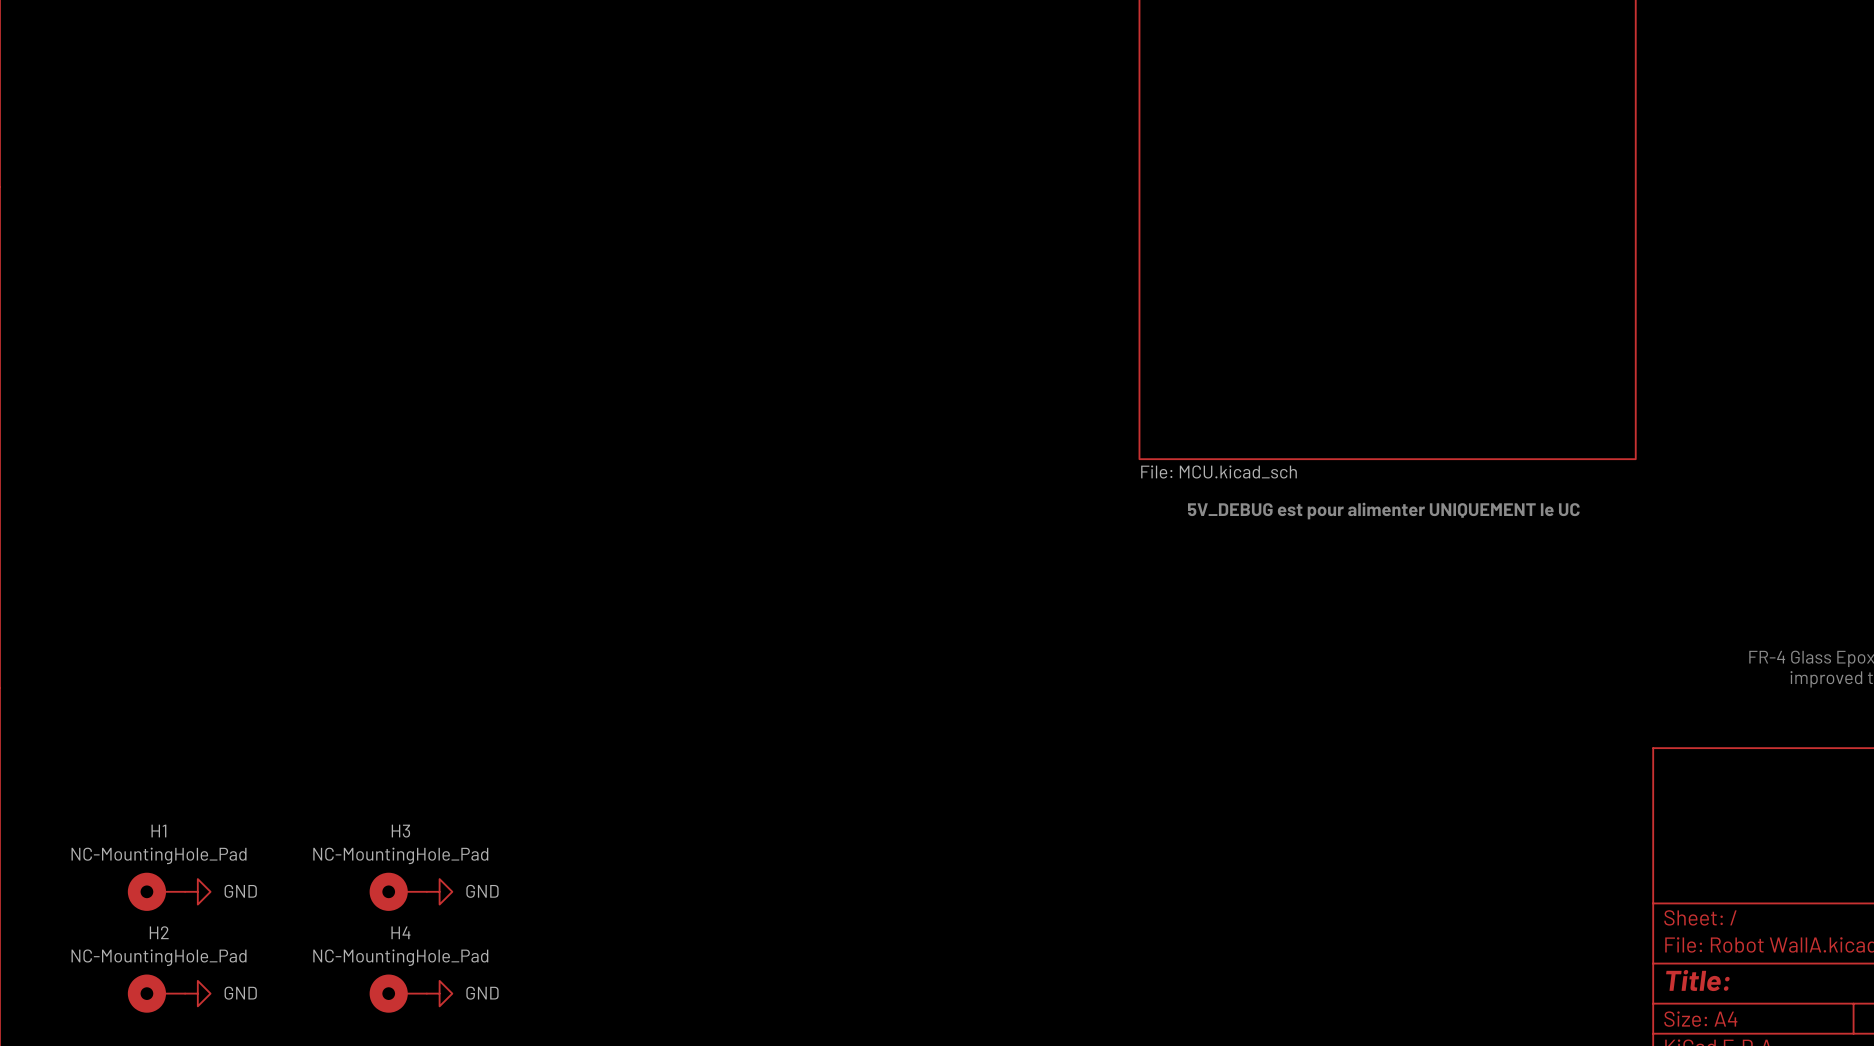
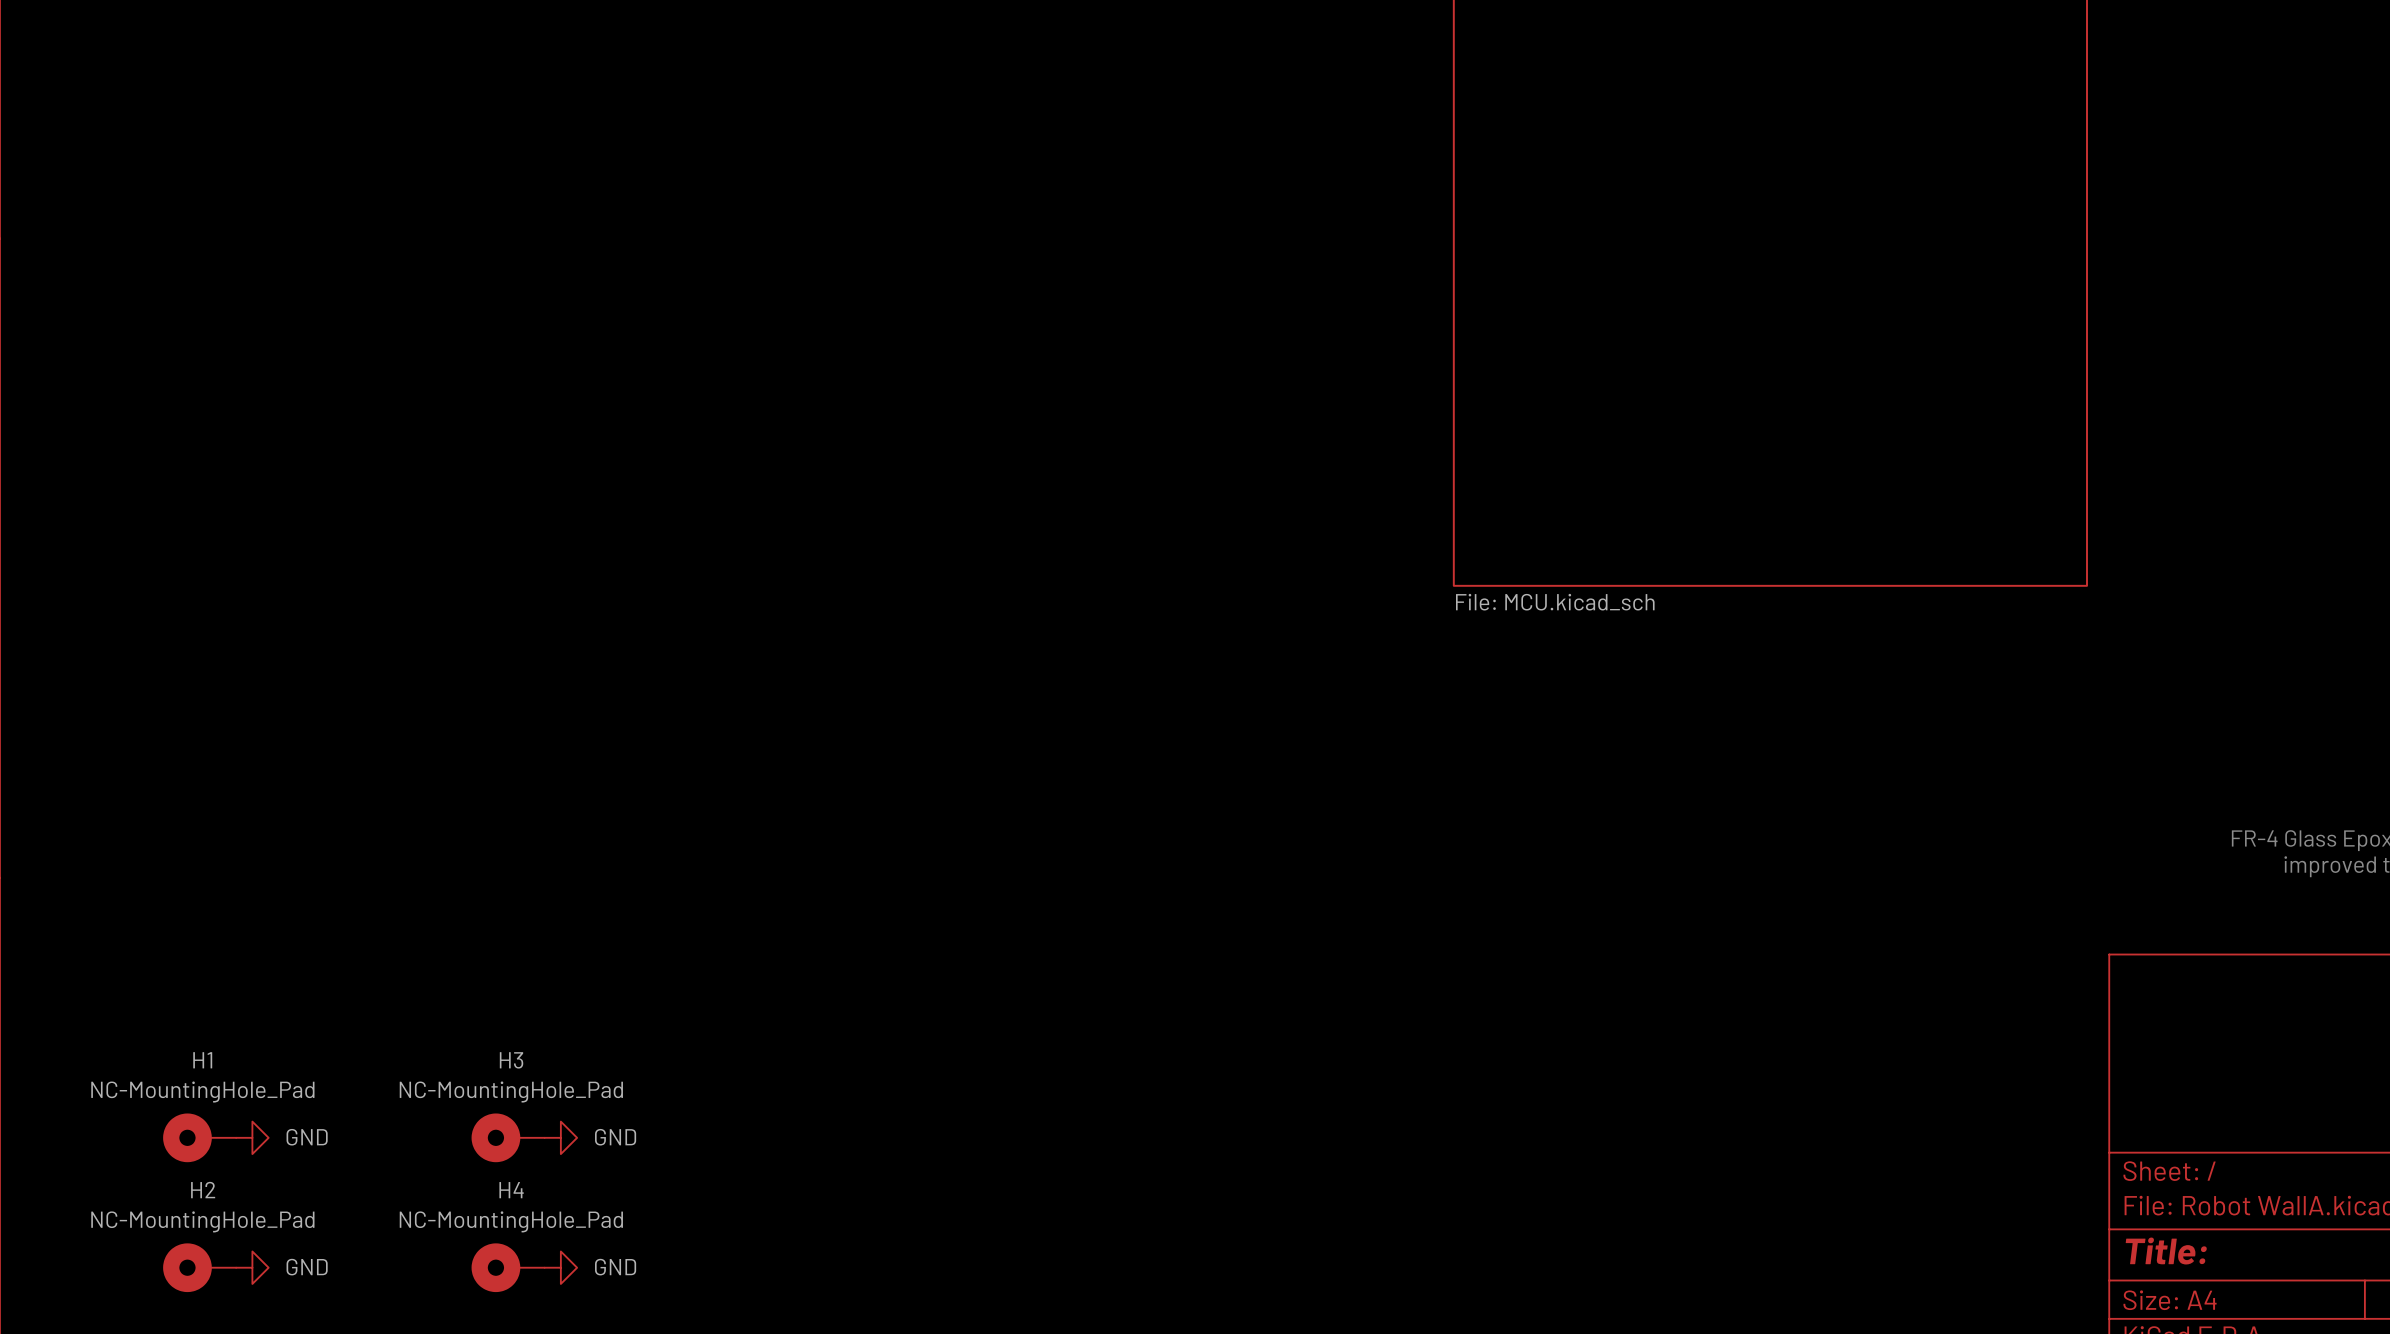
text: 5V_DEBUG est pour alimenter UNIQUEMENT le UC (1383, 511) -> none

